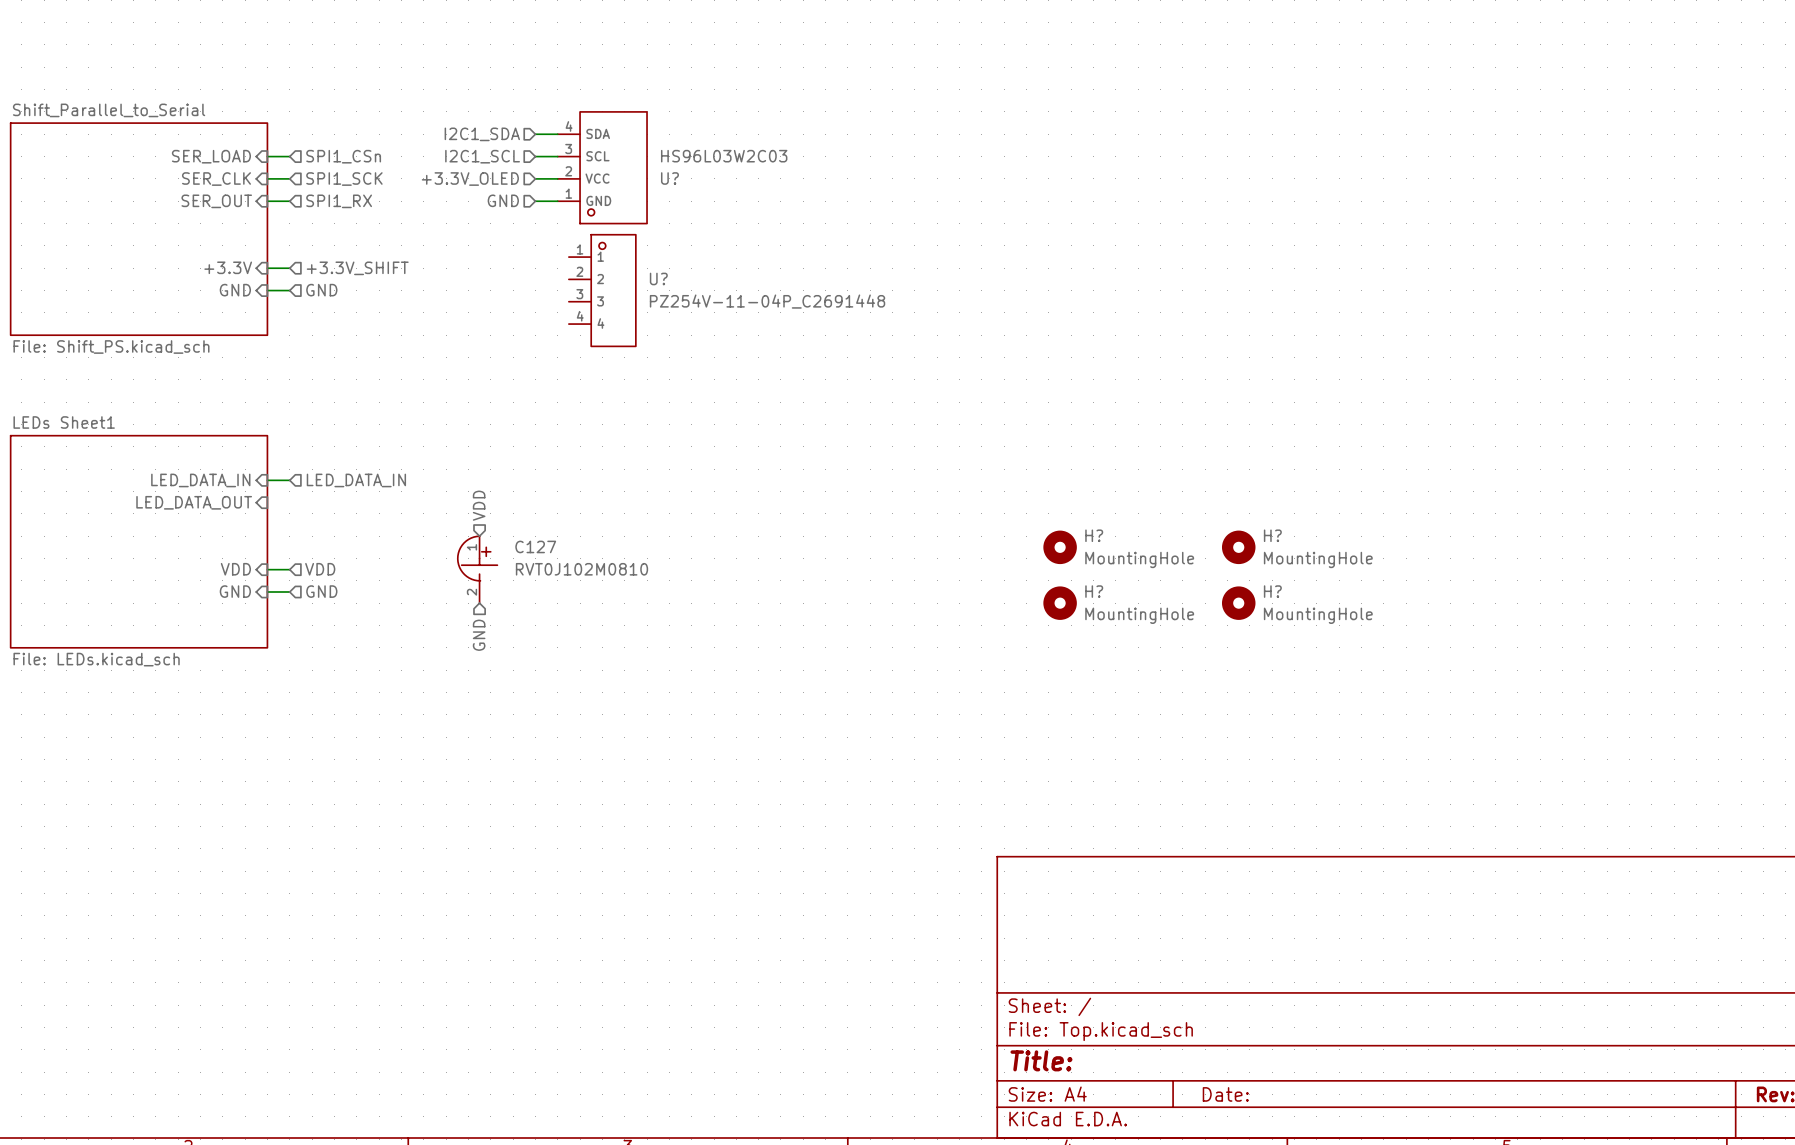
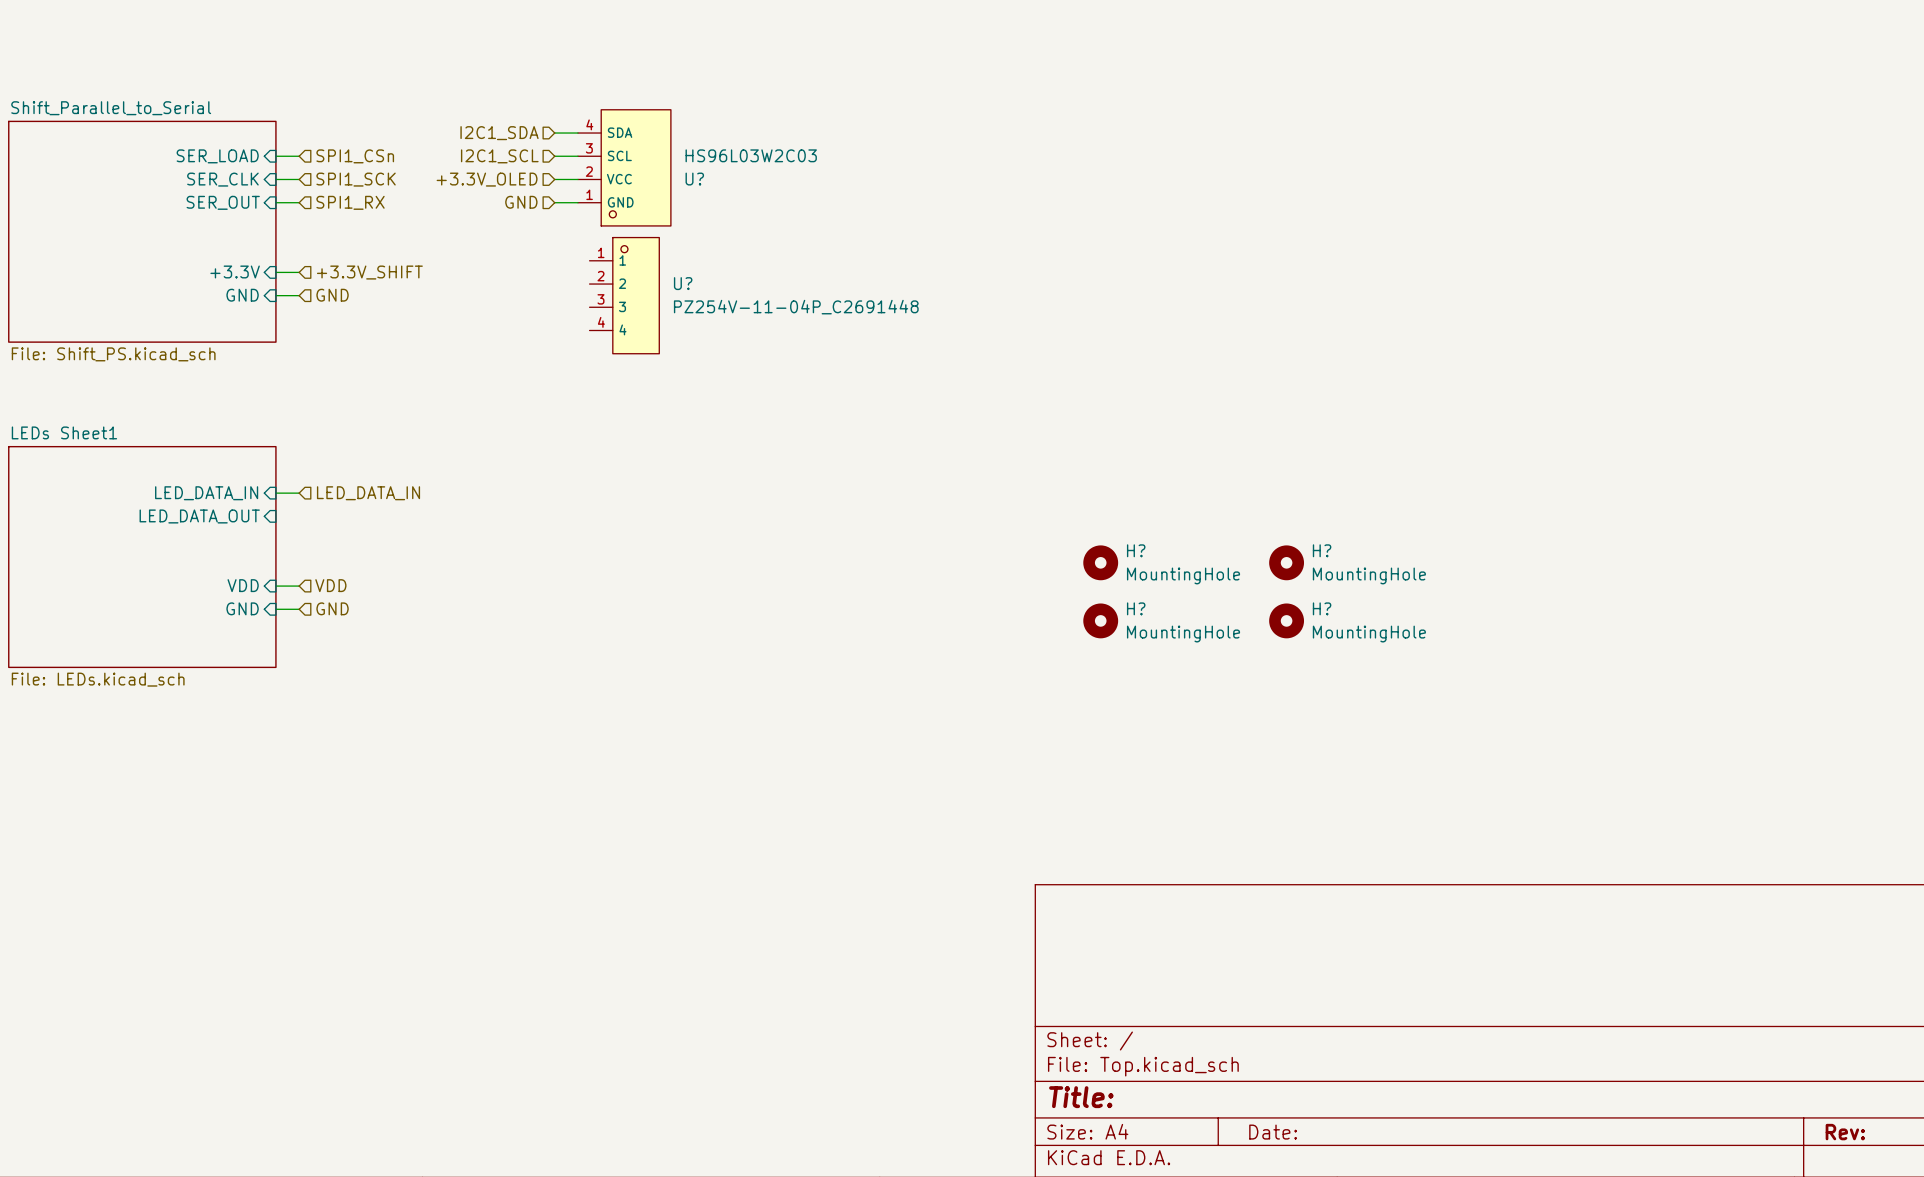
hierarchical label: VDD (479, 505) -> none
C127: RVT0J102M0810 (477, 569) -> none
hierarchical label: GND (479, 635) -> none

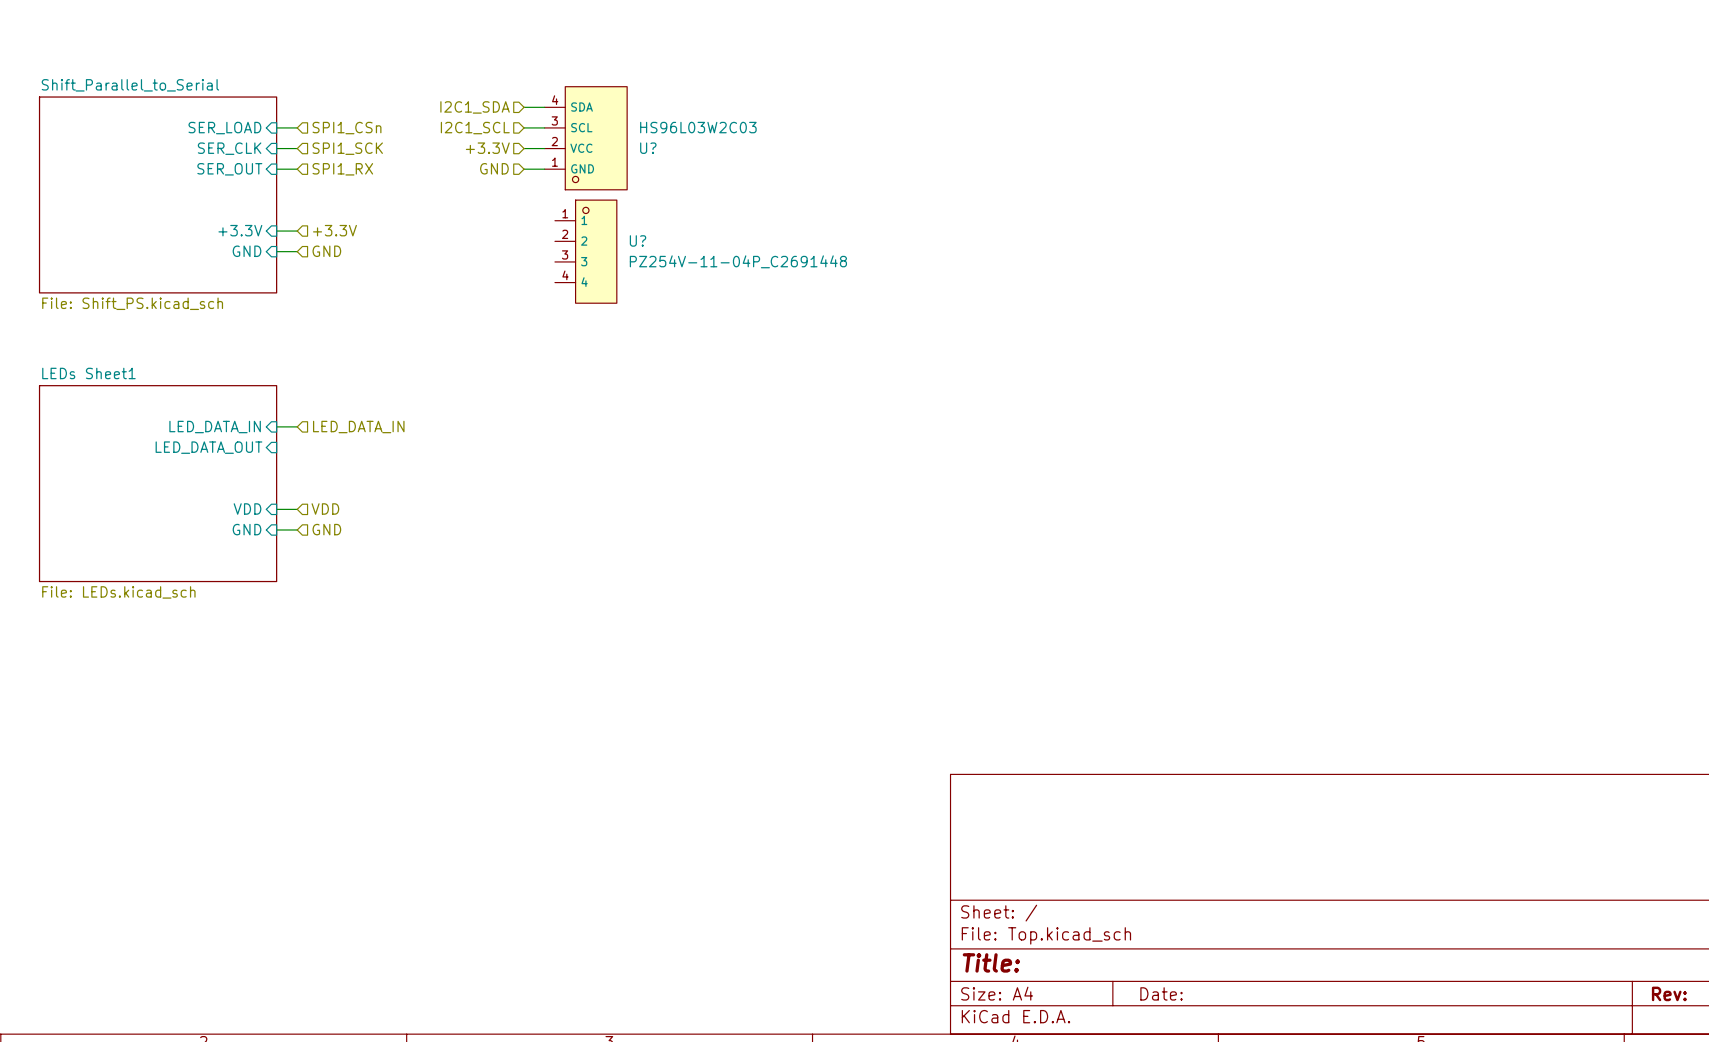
hierarchical label: +3.3V_OLED (487, 179) -> +3.3V (487, 148)
hierarchical label: +3.3V_SHIFT (369, 272) -> +3.3V (334, 230)
H?: MountingHole (1100, 562) -> none
H?: MountingHole (1286, 562) -> none
H?: MountingHole (1100, 620) -> none
H?: MountingHole (1286, 620) -> none

